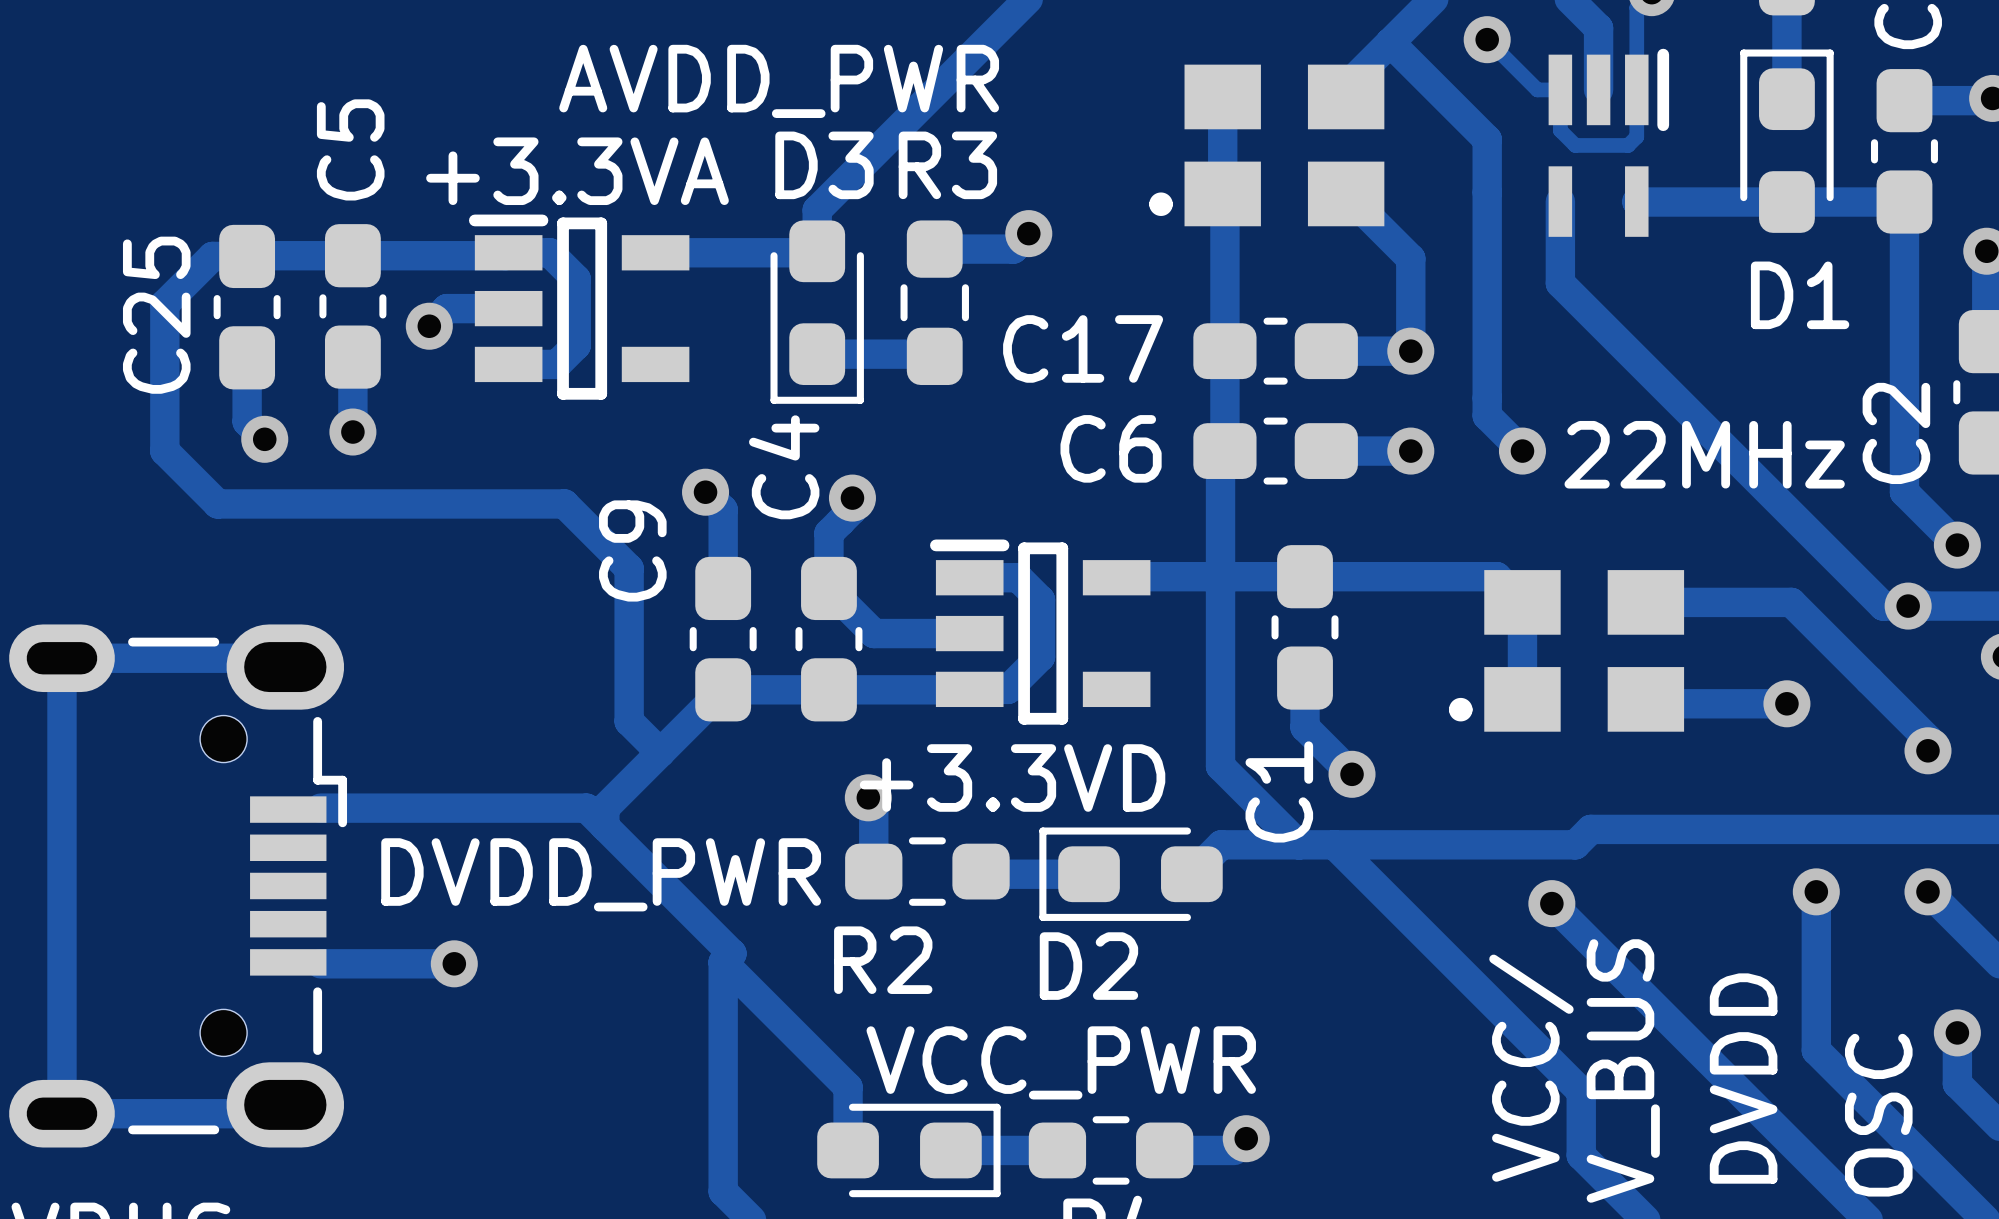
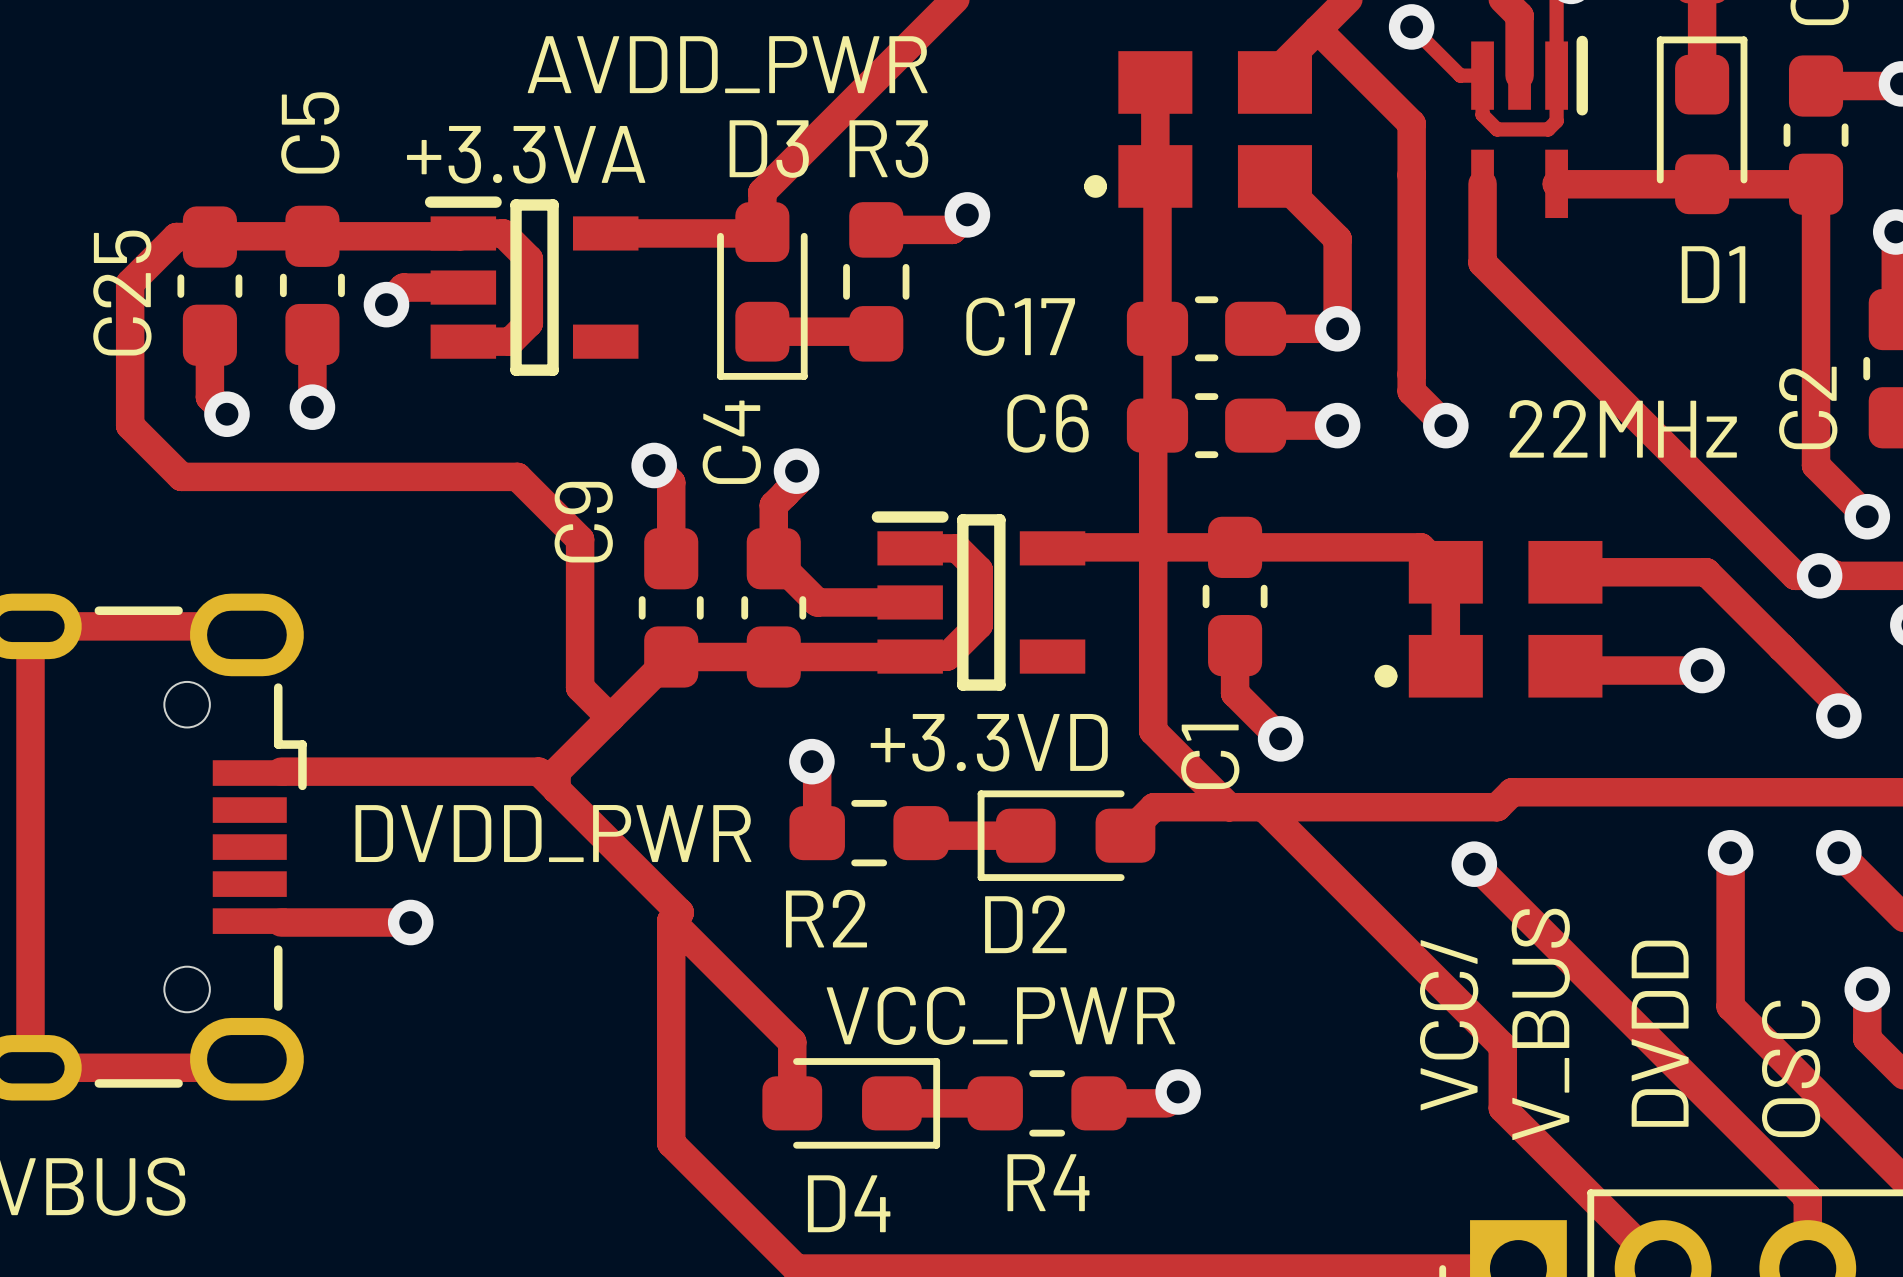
text position: +3.3VD (1012, 777) -> +3.3VD (989, 742)

